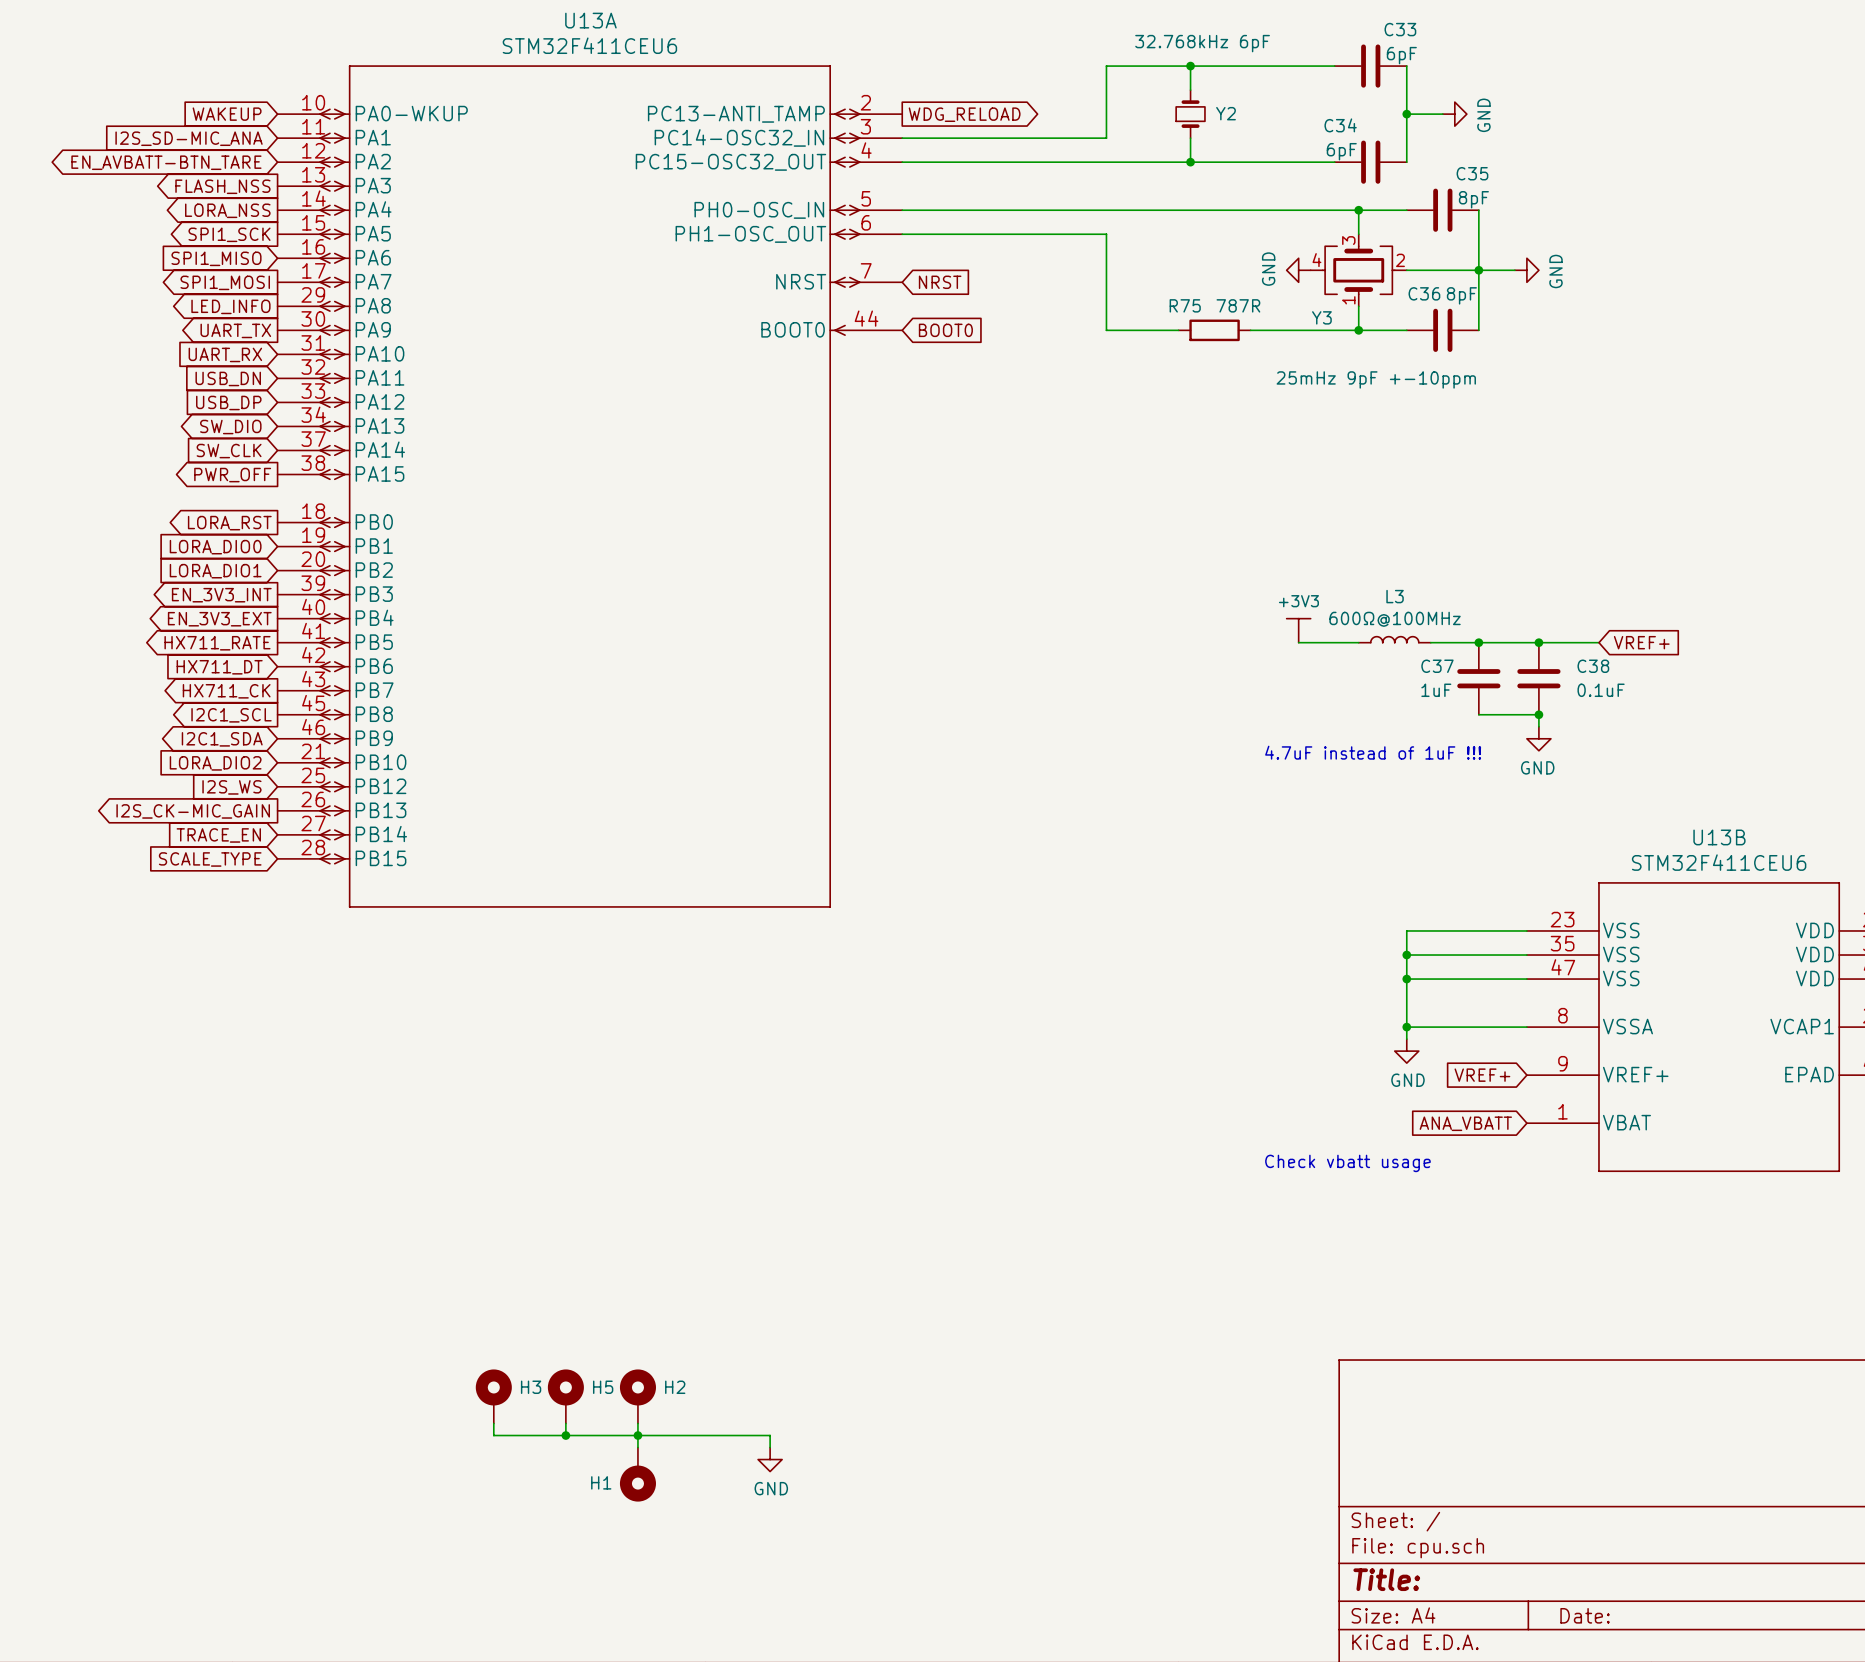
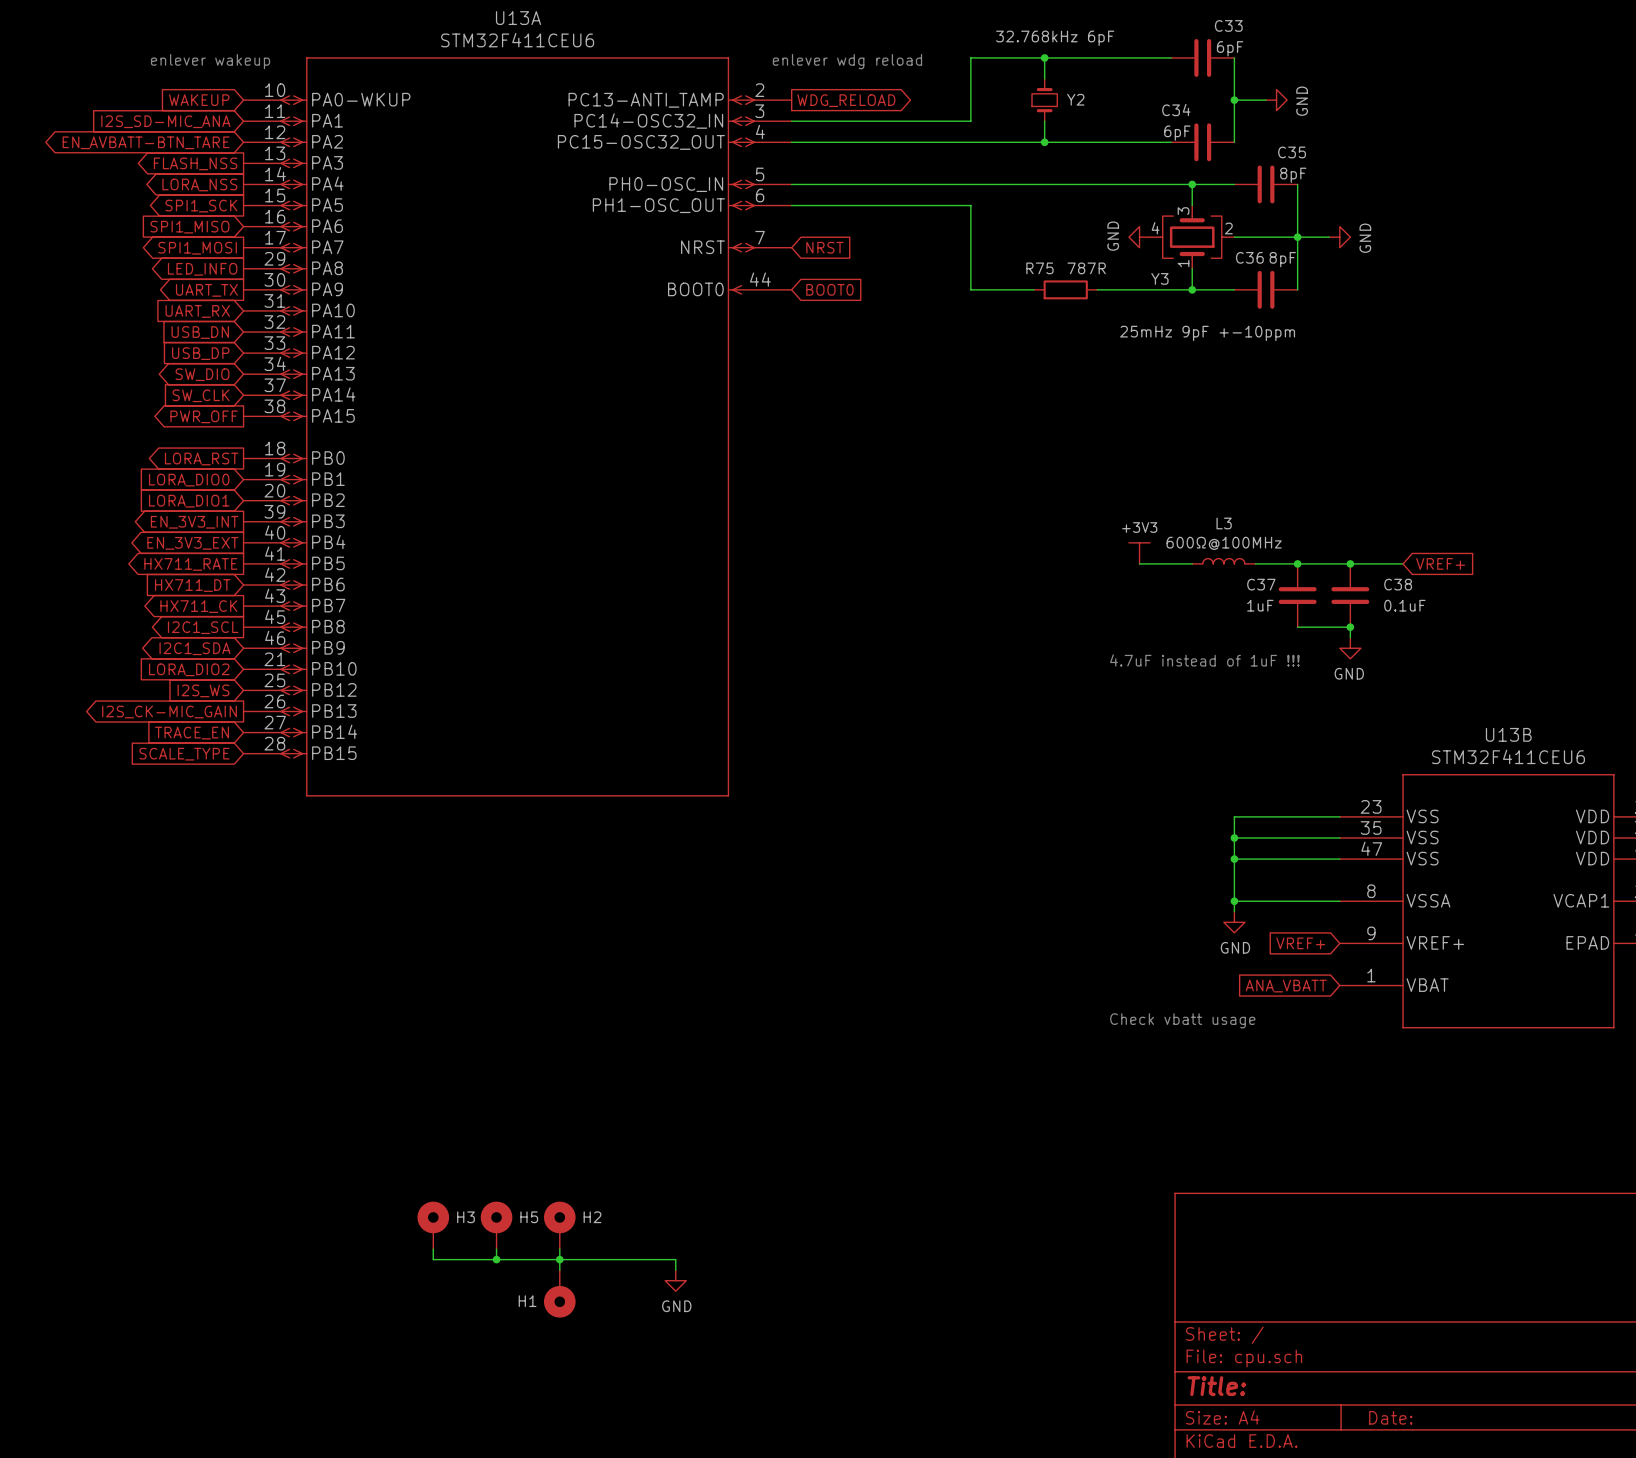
text: none -> enlever wakeup (210, 61)
text: none -> enlever wdg reload (847, 61)

